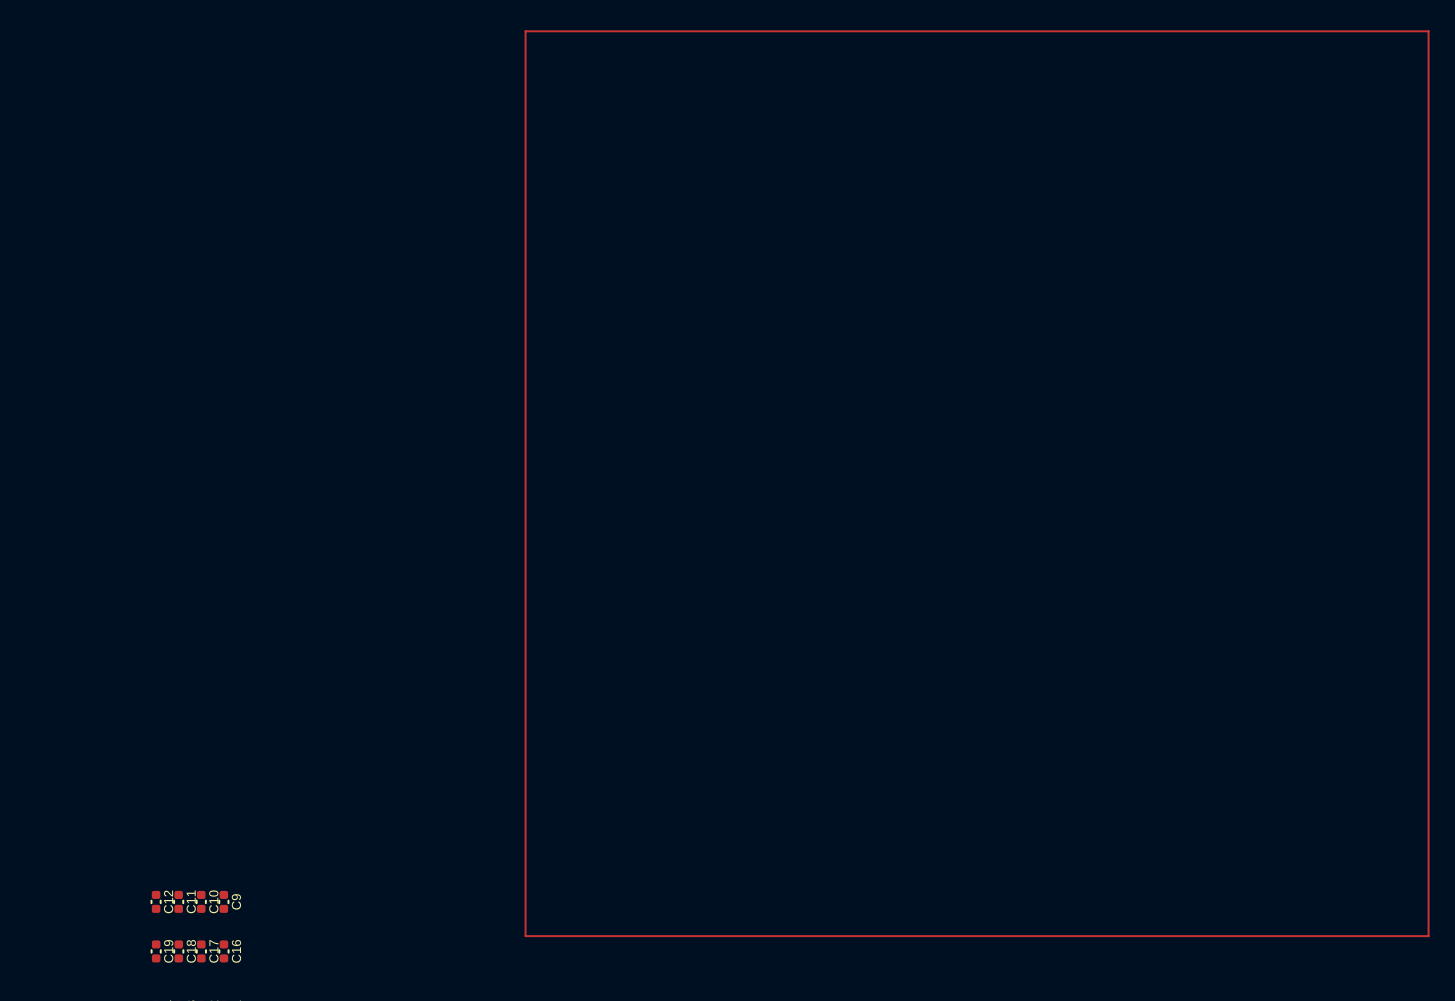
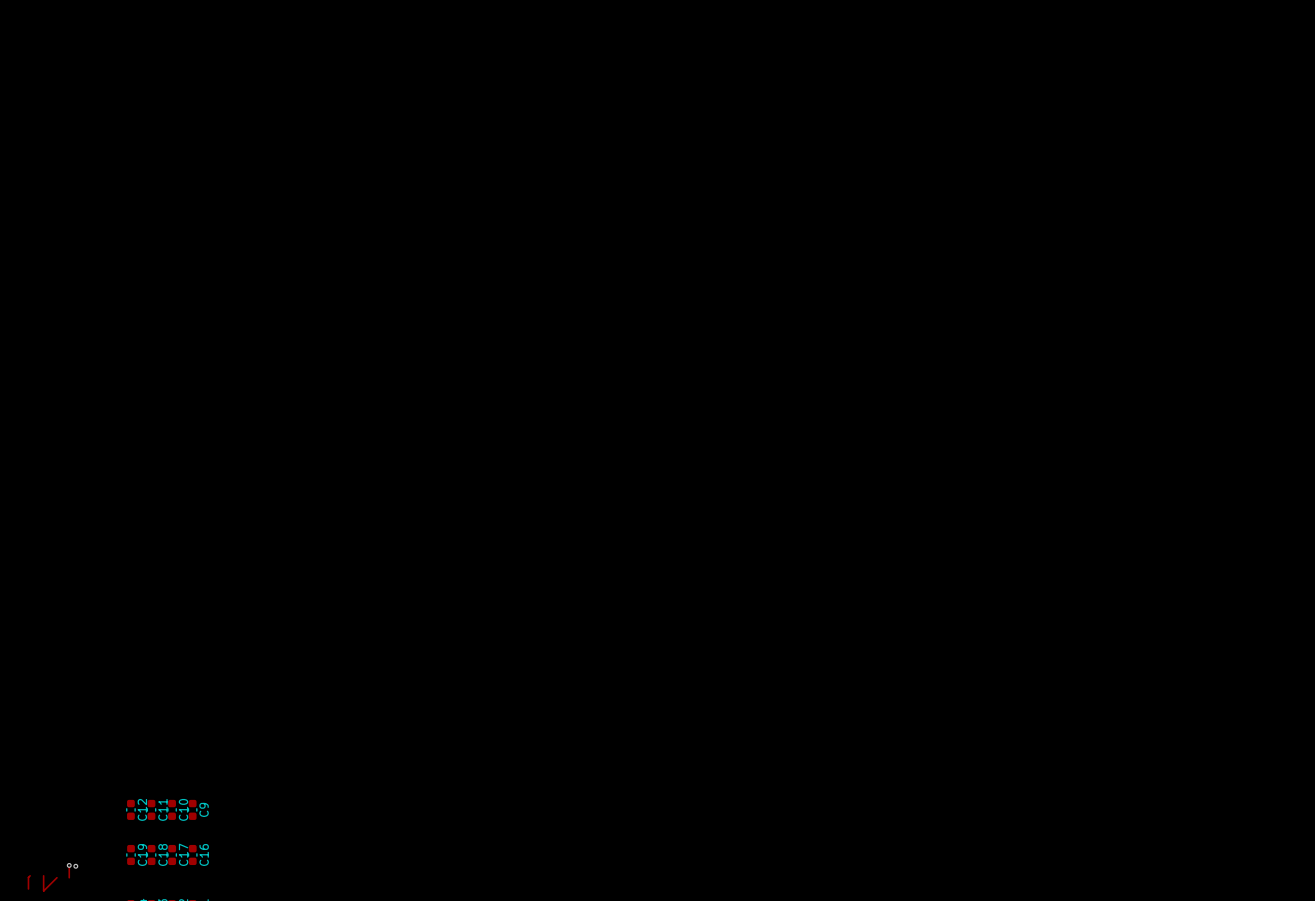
track: (525, 31) (1428, 31) (1428, 936) (525, 936) (525, 31) -> none
track: none -> (69, 865) (69, 877)
via: none -> (69, 865)
via: none -> (75, 866)
track: none -> (30, 875) (28, 888)
track: none -> (43, 875) (43, 890) (56, 877)

